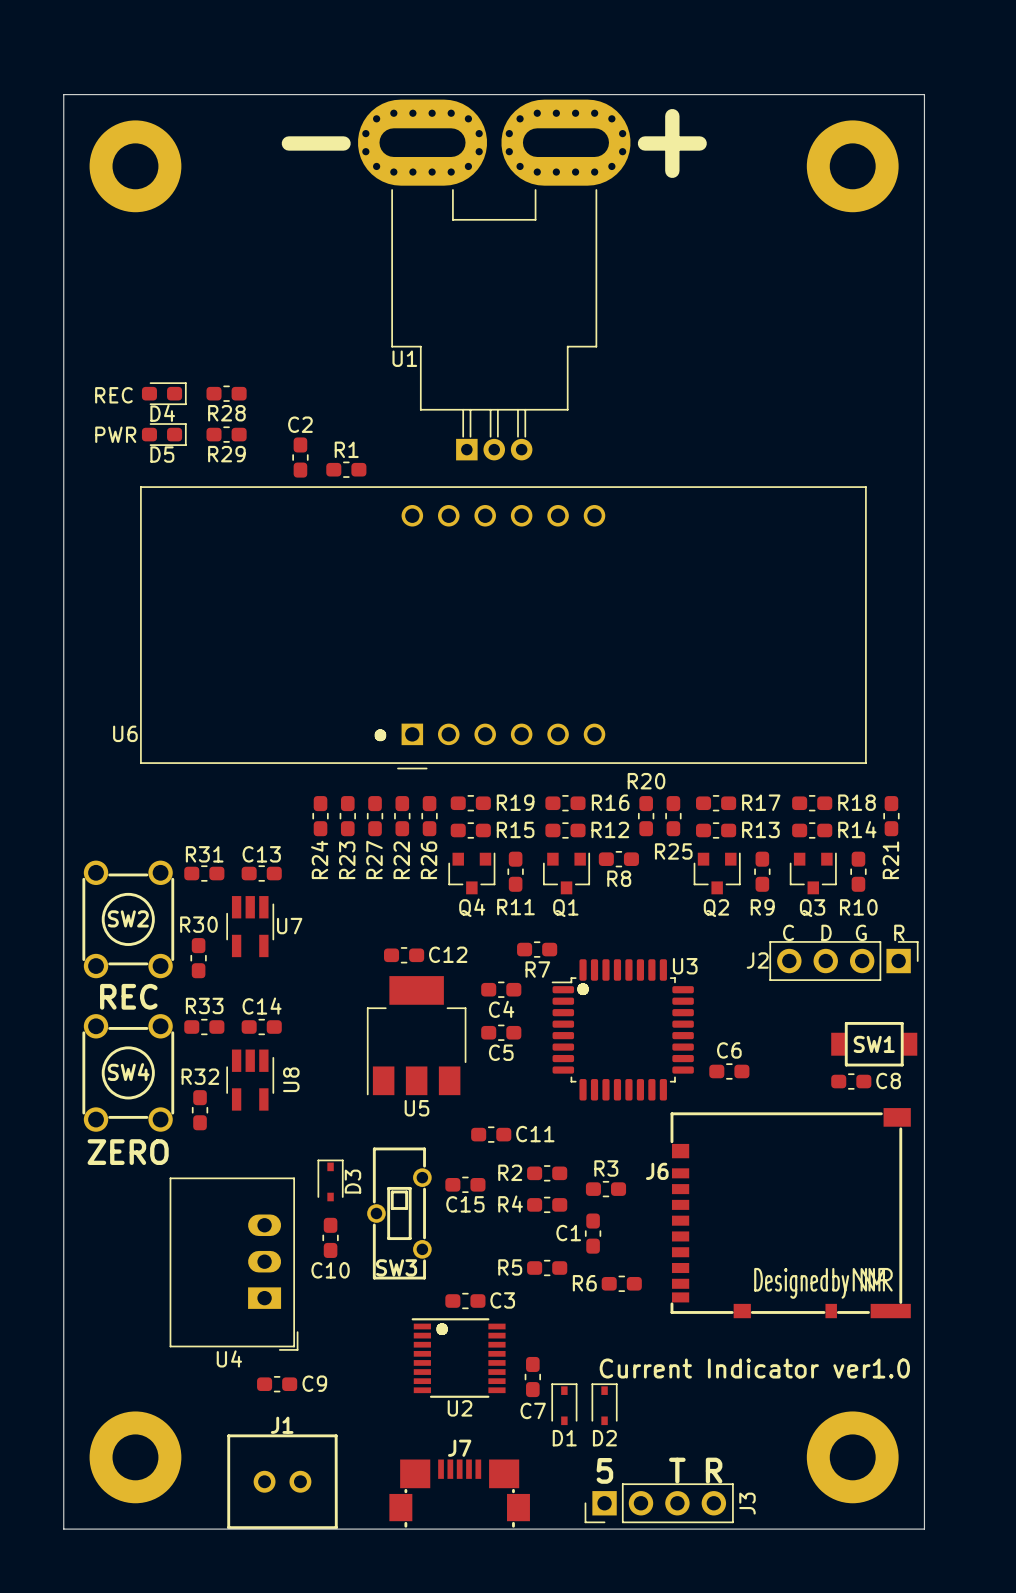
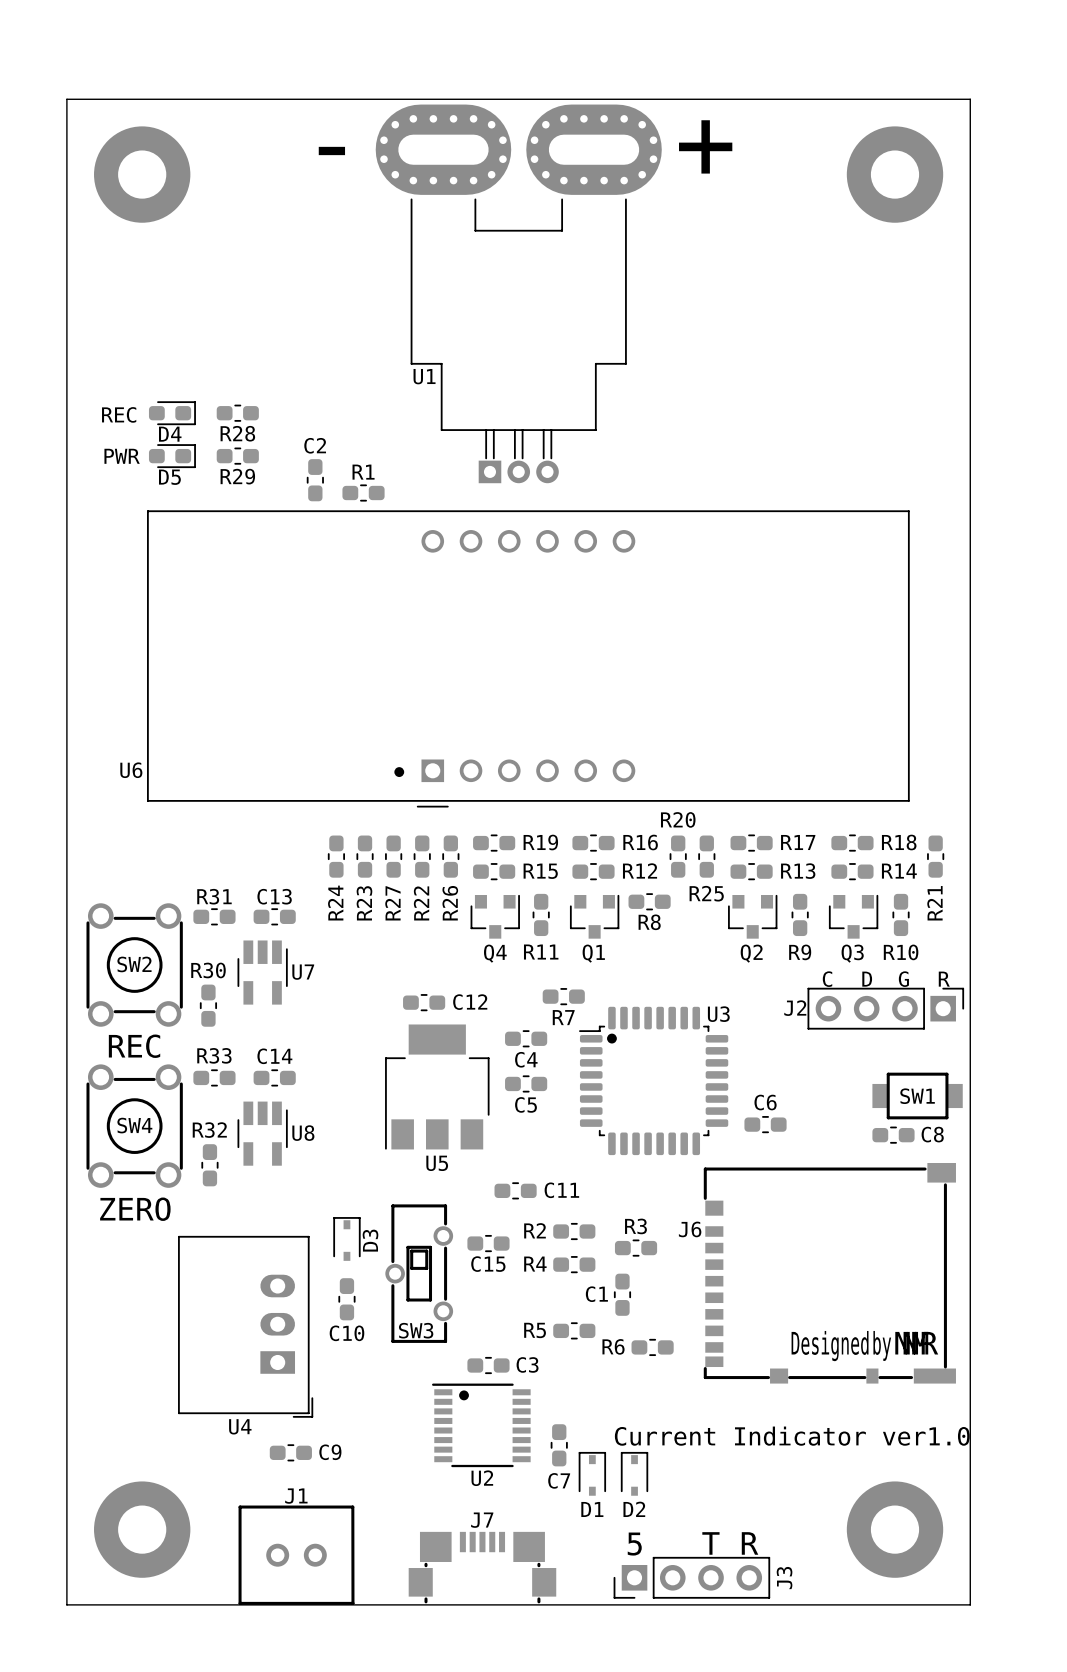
U8 name rotation: 0° (291, 1079) -> 90° clockwise (303, 1133)

